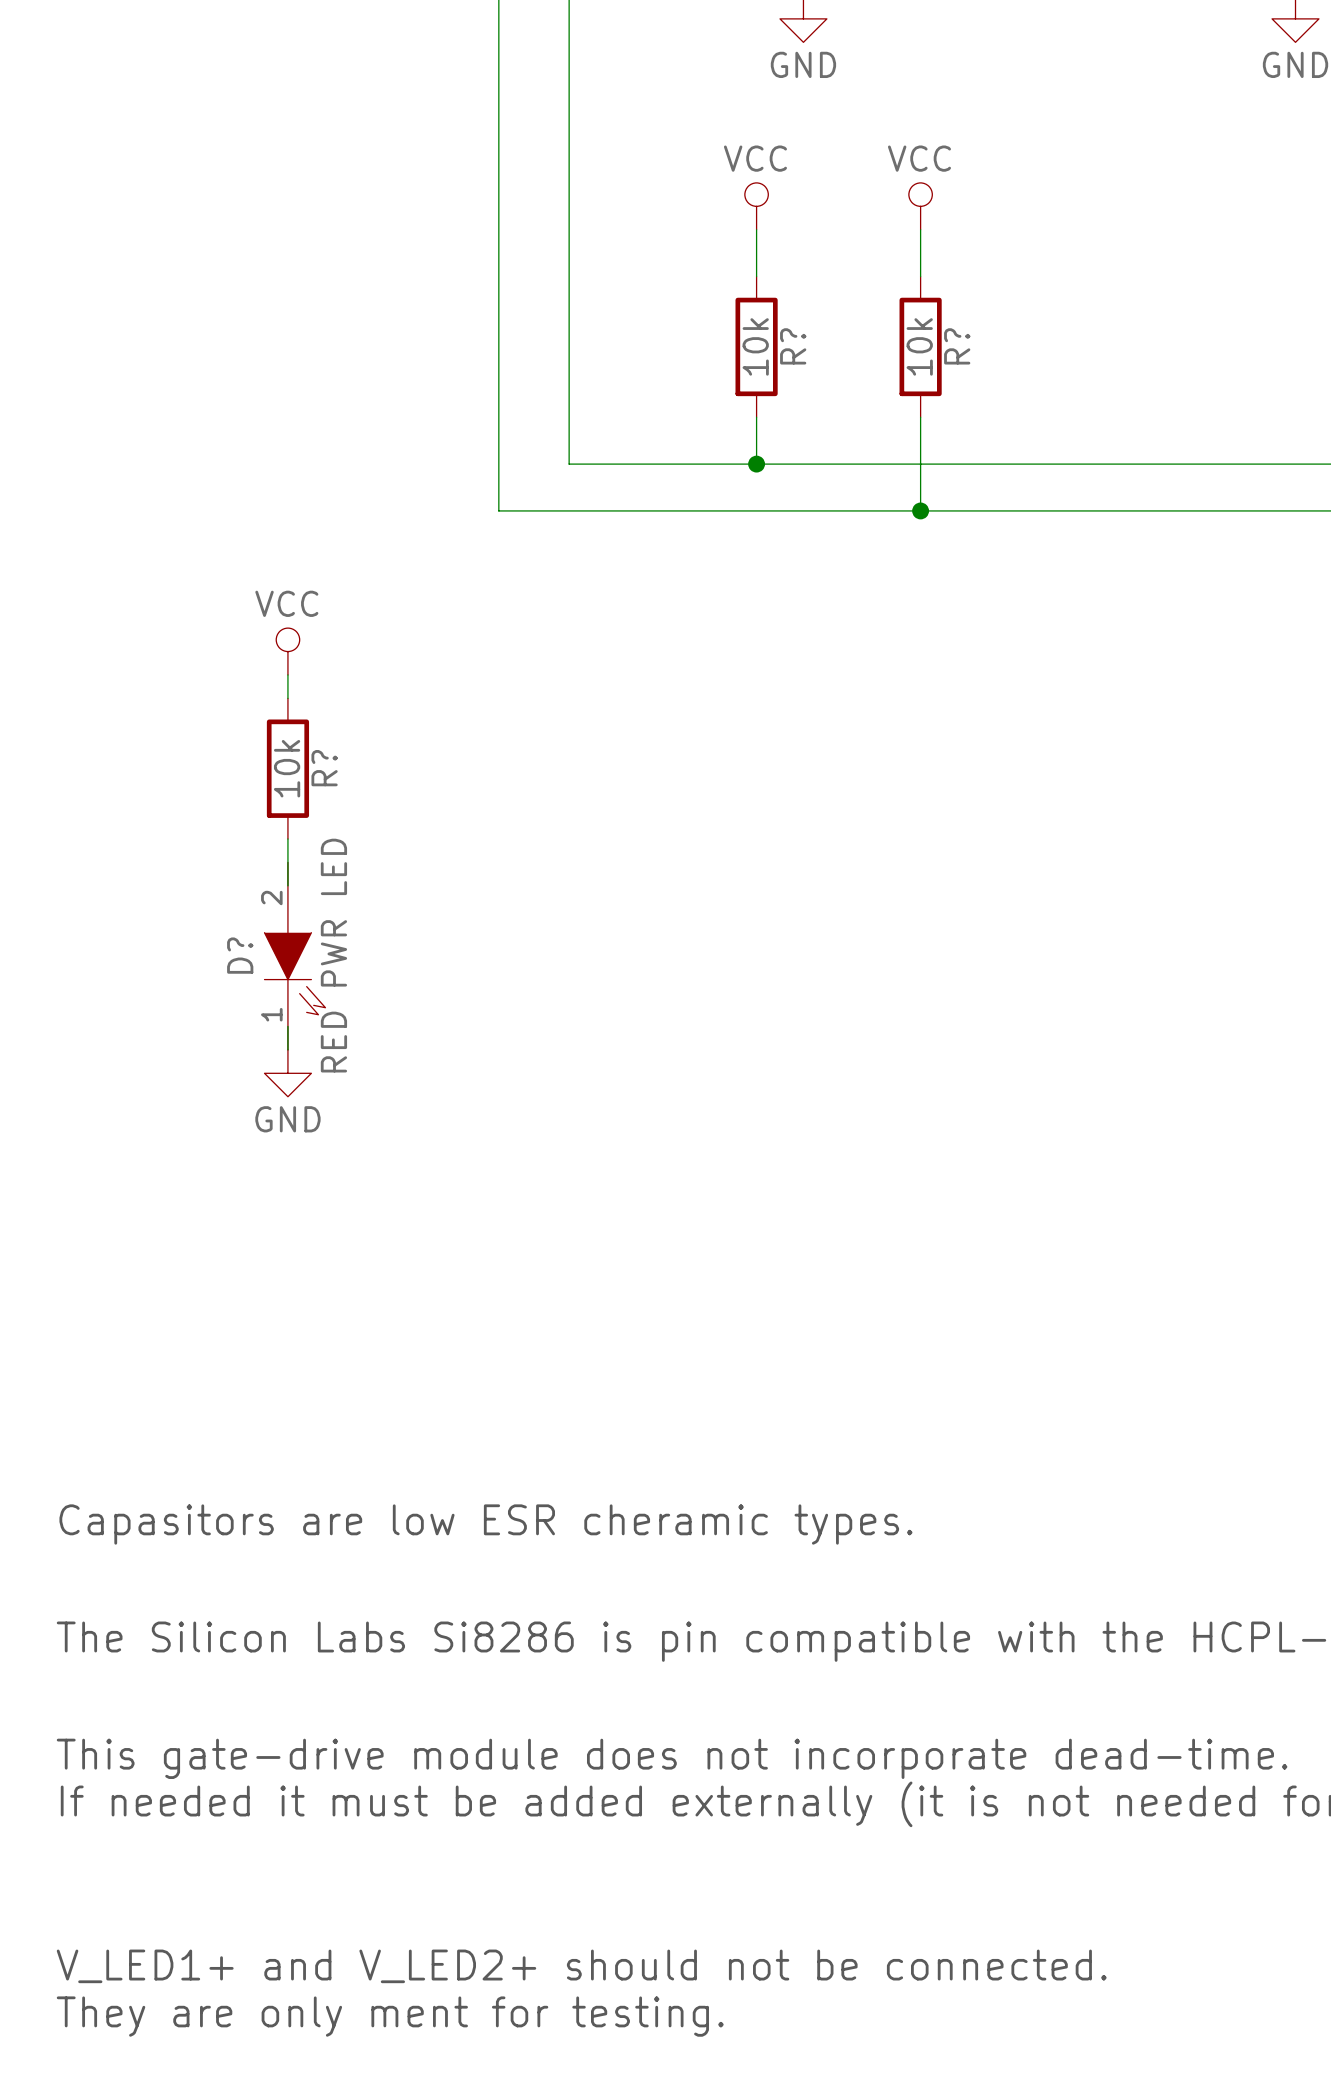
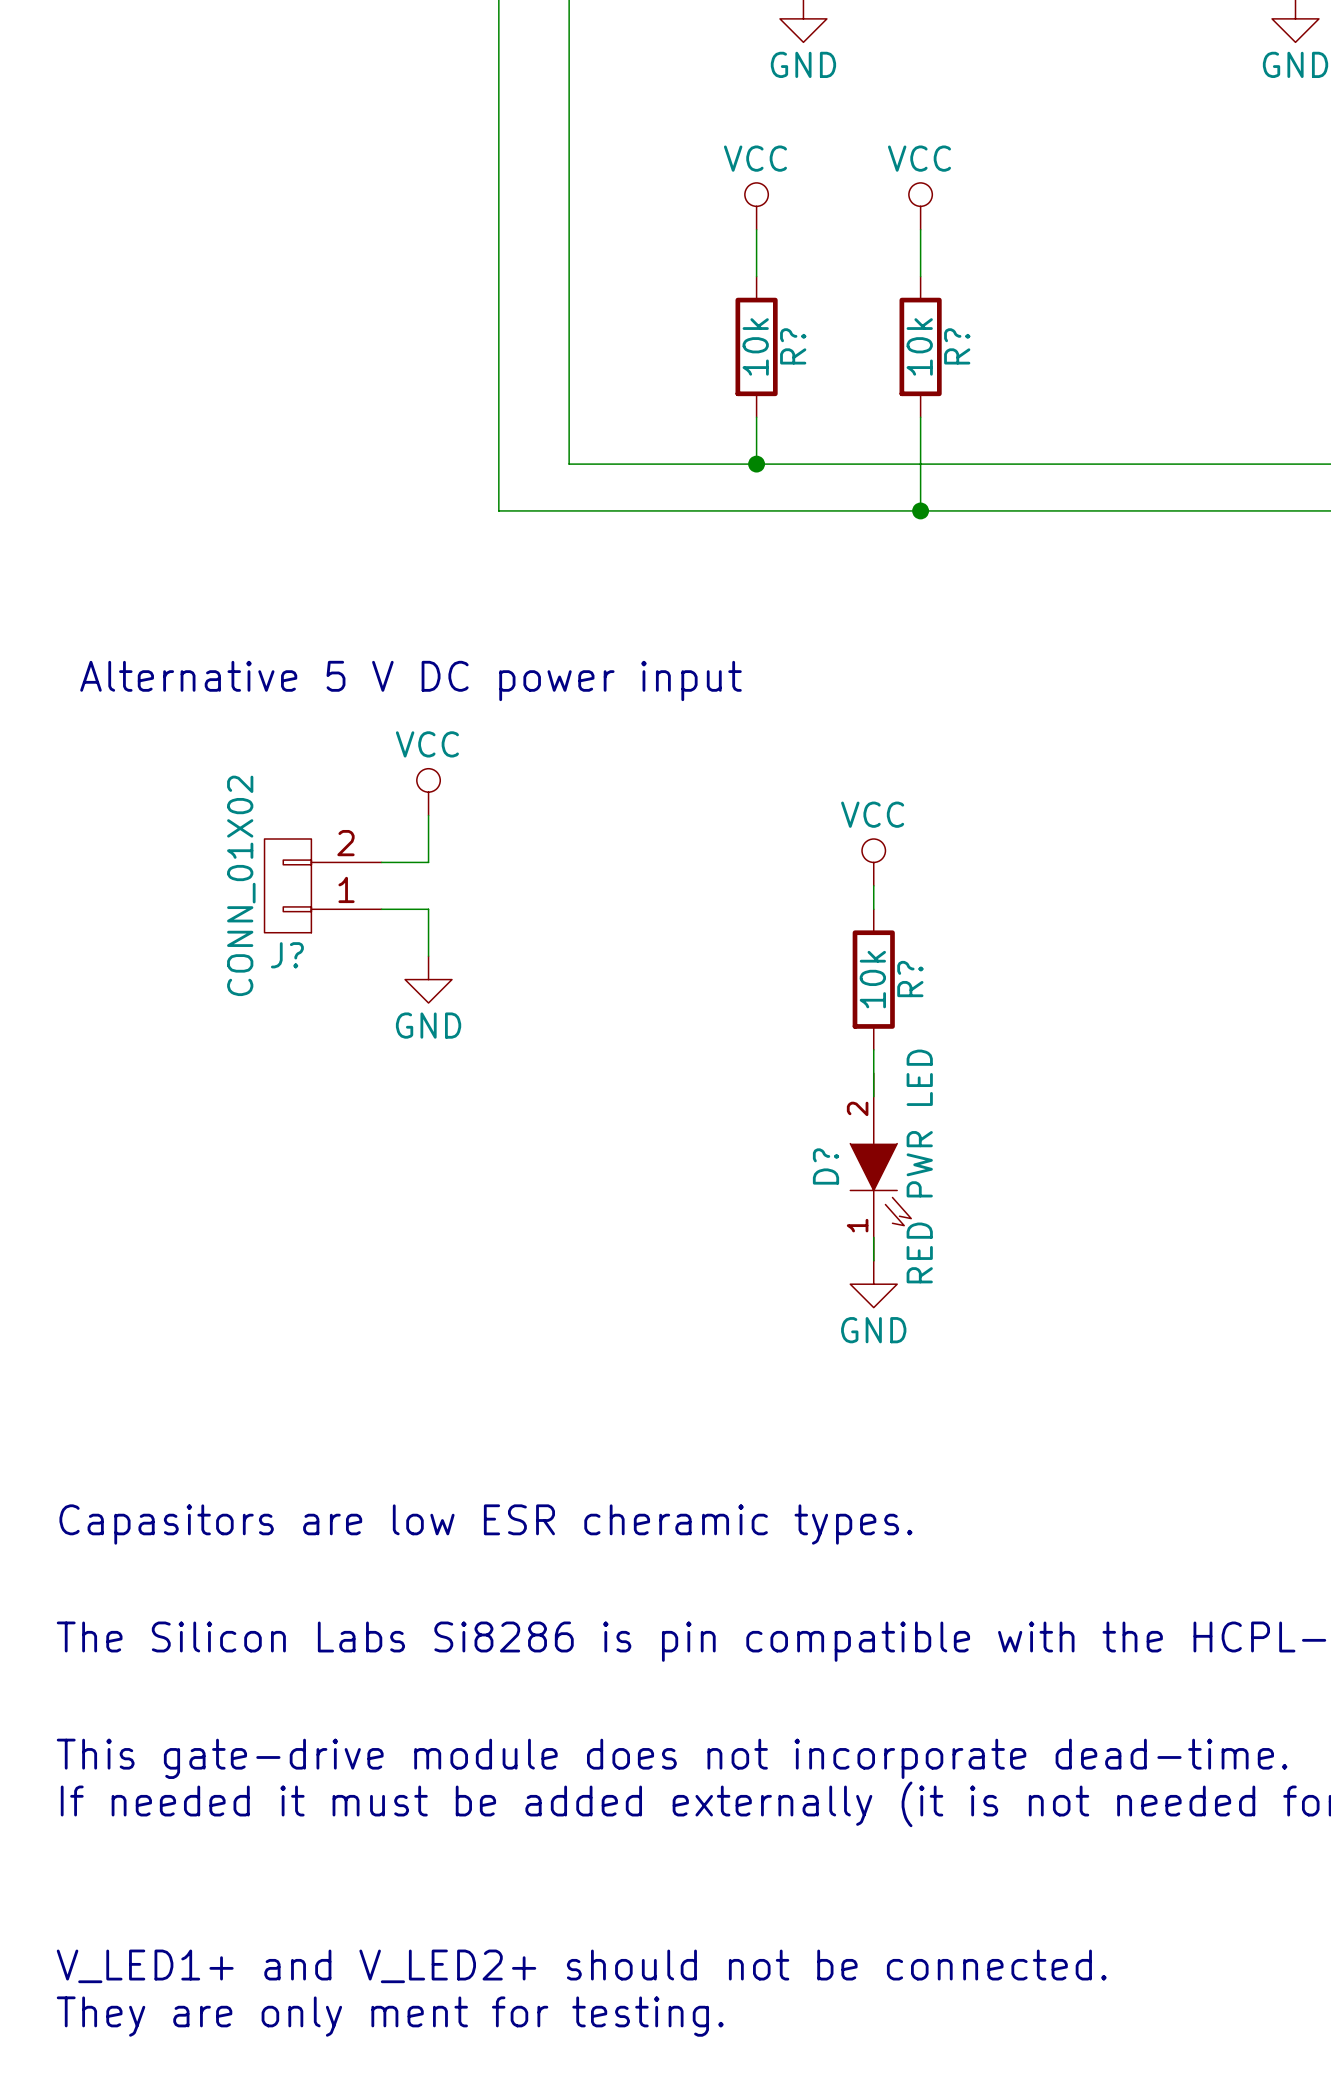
power symbol position: VCC (287, 651) -> VCC (428, 792)
wire: (287, 674) (287, 698) -> none
text: none -> Alternative 5 V DC power input (410, 680)
R?: 10k (287, 768) -> none
wire: none -> (428, 815) (428, 862) (381, 862)
wire: (287, 839) (287, 885) -> none
power symbol: none -> VCC (873, 862)
J?: none -> CONN_01X02 (323, 885)
wire: none -> (873, 885) (873, 909)
wire: none -> (381, 909) (428, 909) (428, 956)
D?: RED PWR LED (294, 956) -> none
R?: none -> 10k (873, 979)
wire: (287, 1026) (287, 1049) -> none
wire: none -> (873, 1049) (873, 1096)
power symbol position: GND (287, 1073) -> GND (428, 979)
D?: none -> RED PWR LED (880, 1167)
wire: none -> (873, 1237) (873, 1260)
power symbol: none -> GND (873, 1284)

